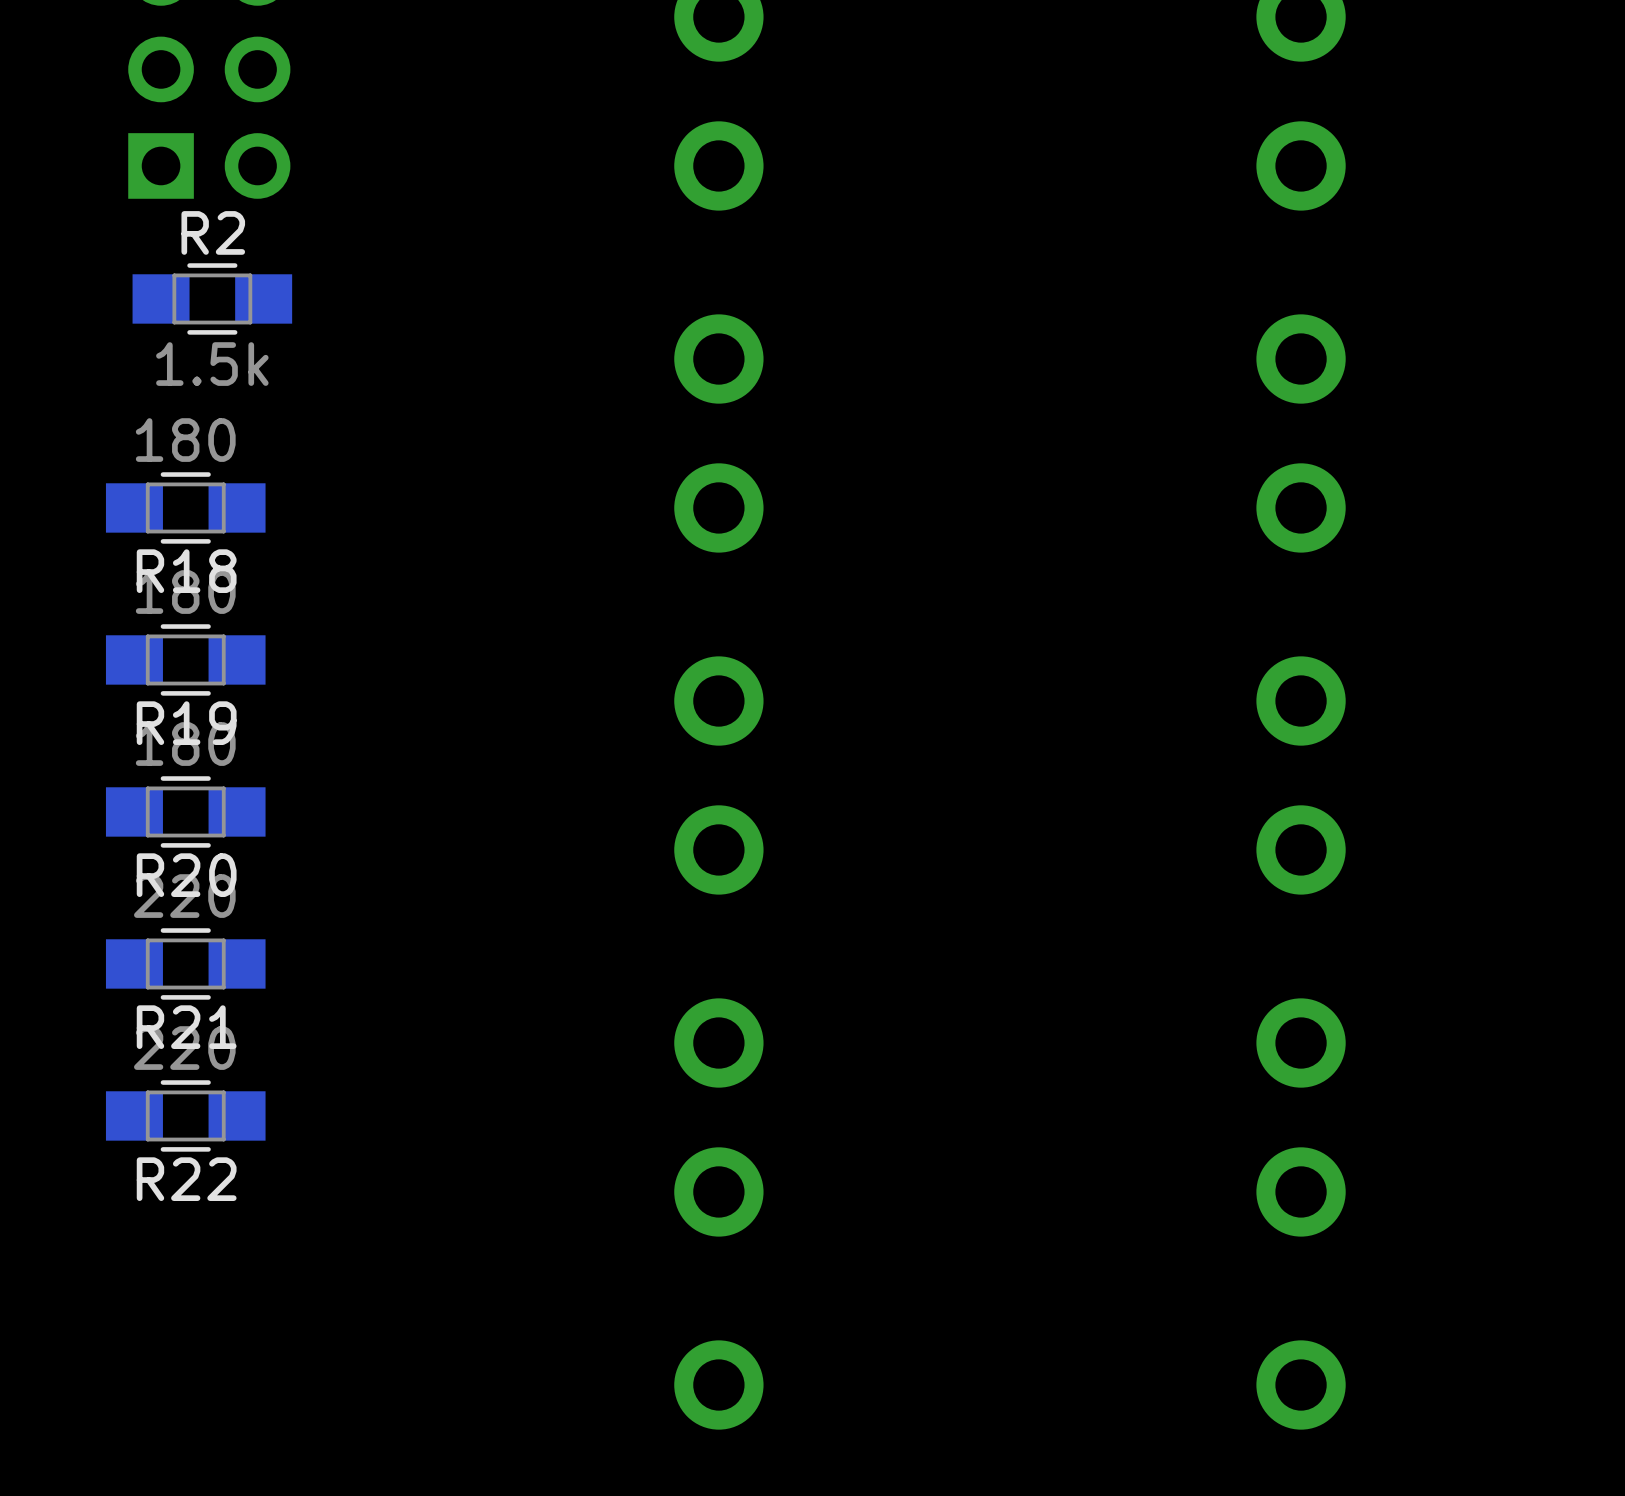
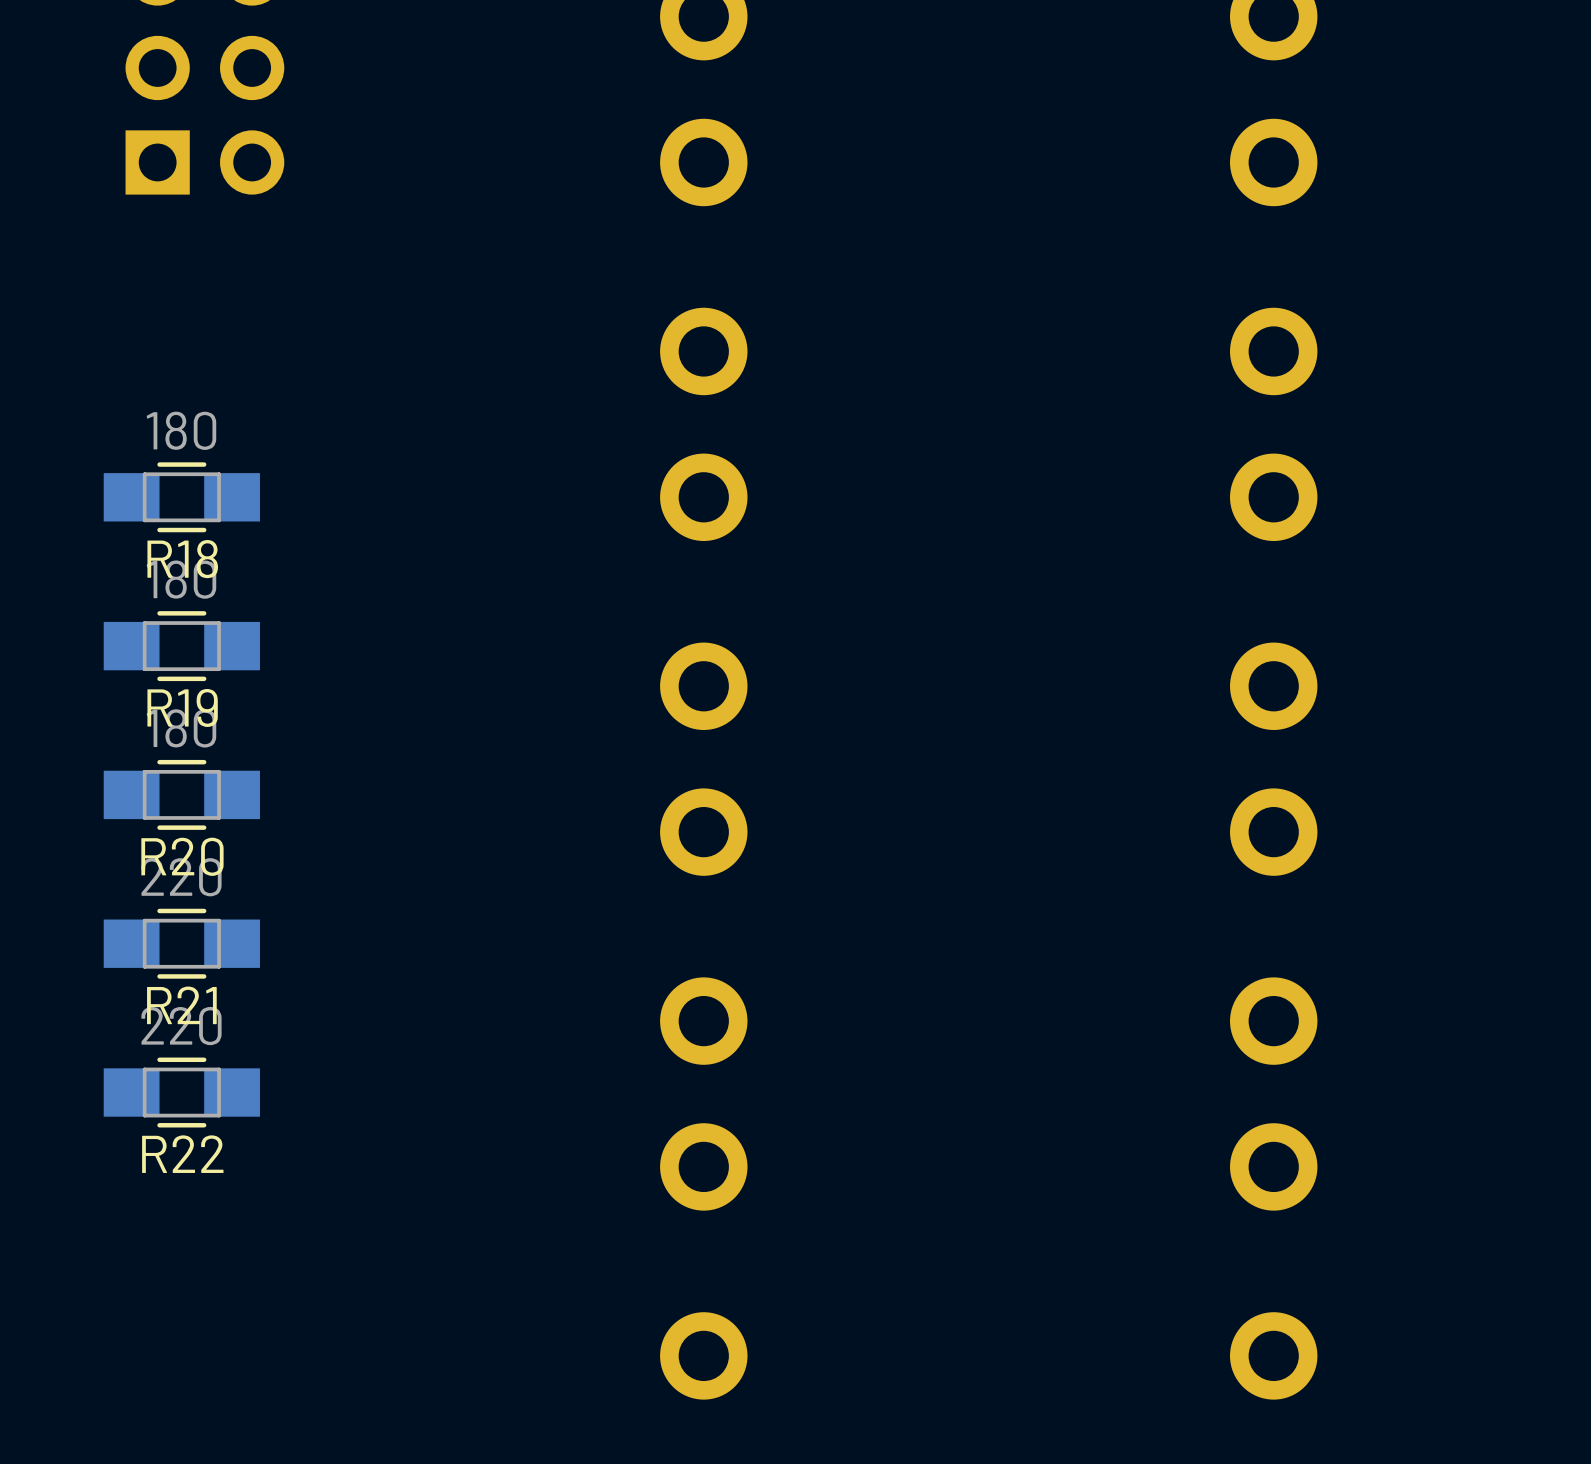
R2: 1.5k (212, 298) -> none

